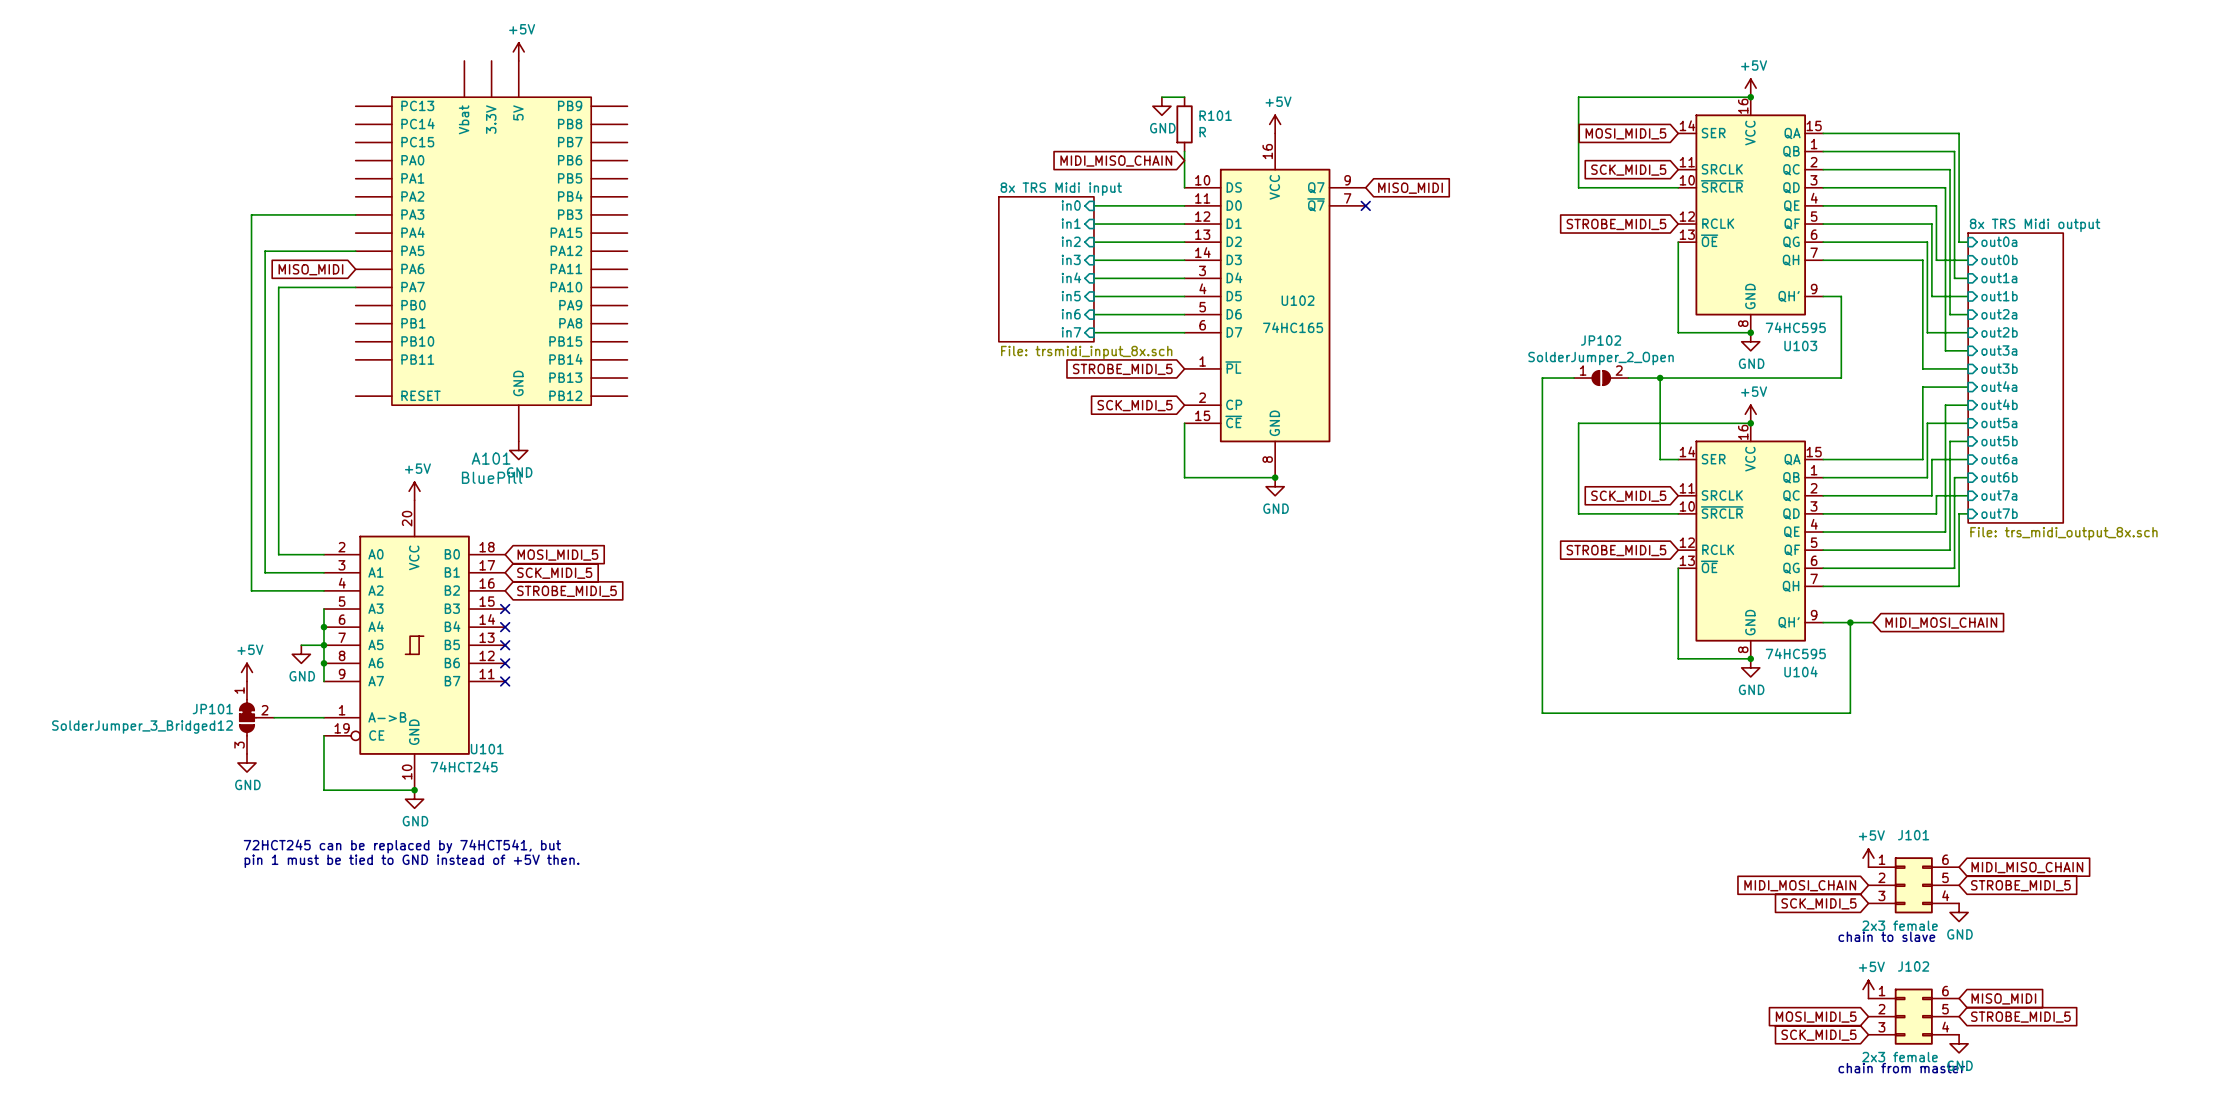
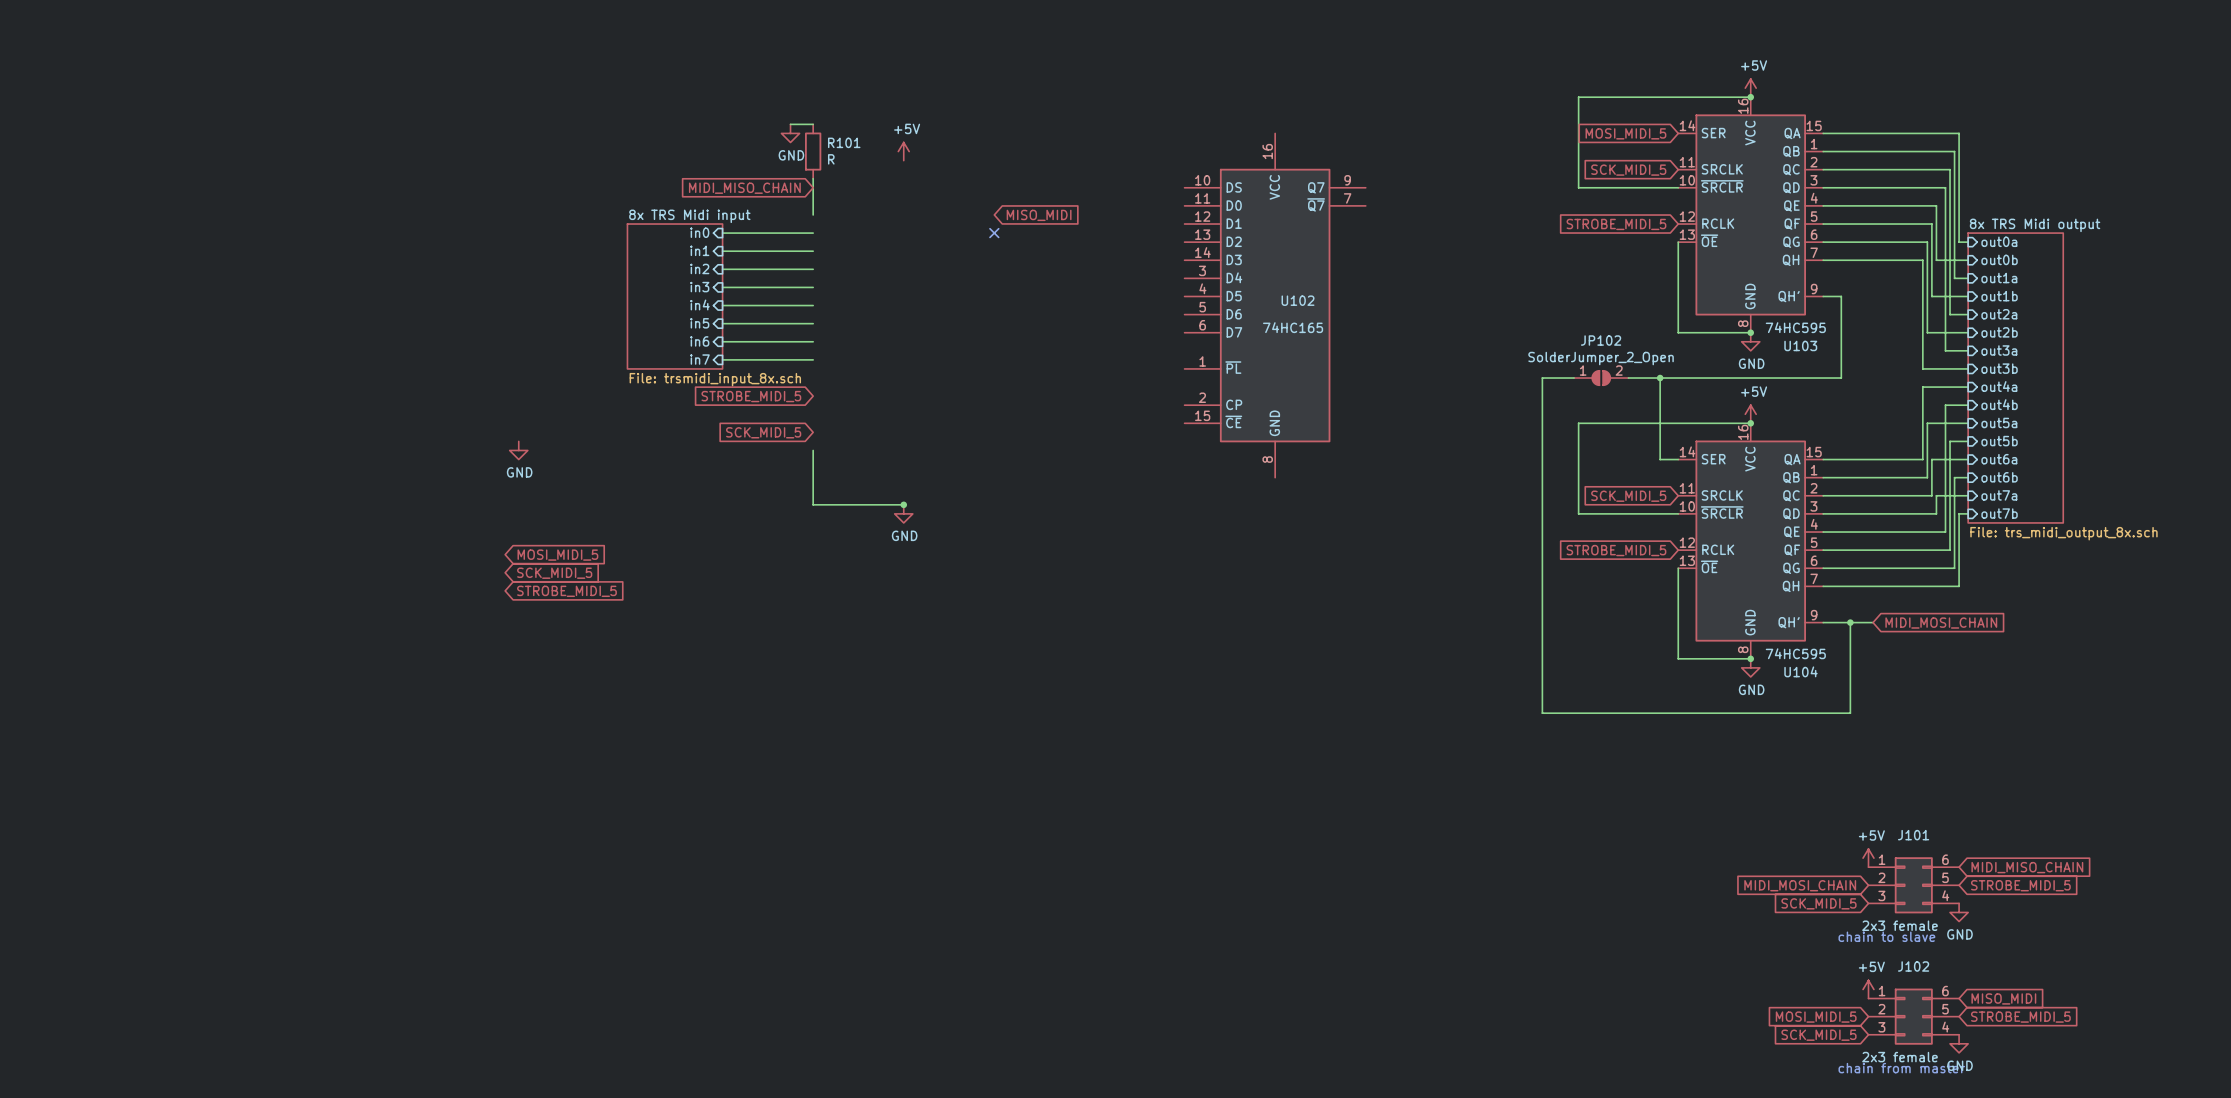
power symbol: +5V (518, 51) -> none
wire: (1161, 97) (1184, 97) -> none
power symbol: GND (1161, 106) -> none
wire: none -> (790, 124) (813, 124)
R101 position: (1184, 124) -> (813, 151)
power symbol: +5V (1275, 124) -> none
power symbol: none -> GND (790, 133)
power symbol: none -> +5V (903, 151)
wire: (1184, 151) (1184, 187) -> none
global label: MIDI_MISO_CHAIN (1116, 161) -> none
wire: none -> (813, 178) (813, 214)
global label: none -> MIDI_MISO_CHAIN (744, 188)
global label: MISO_MIDI (1410, 188) -> none
sheet pin: in0 (1071, 205) -> none
wire: (1093, 205) (1184, 205) -> none
no-connect mark: (1365, 205) -> none
wire: (355, 214) (251, 214) (251, 590) (323, 590) -> none
global label: none -> MISO_MIDI (1039, 215)
sheet pin: in1 (1071, 223) -> none
wire: (1093, 224) (1184, 224) -> none
sheet pin: none -> in0 (699, 232)
wire: none -> (722, 233) (813, 233)
no-connect mark: none -> (994, 233)
sheet pin: in2 (1071, 241) -> none
wire: (1093, 242) (1184, 242) -> none
sheet pin: none -> in1 (699, 250)
wire: (355, 251) (265, 251) (265, 572) (323, 572) -> none
A101: BluePill (491, 251) -> none
wire: none -> (722, 251) (813, 251)
sheet pin: in3 (1071, 259) -> none
wire: (1093, 260) (1184, 260) -> none
sheet pin: none -> in2 (699, 268)
global label: MISO_MIDI (310, 269) -> none
wire: none -> (722, 269) (813, 269)
sheet 8x TRS Midi input position: (1046, 269) -> (675, 296)
sheet pin: in4 (1071, 277) -> none
wire: (1093, 278) (1184, 278) -> none
wire: (355, 287) (278, 287) (278, 554) (323, 554) -> none
sheet pin: none -> in3 (699, 287)
wire: none -> (722, 287) (813, 287)
sheet pin: in5 (1071, 296) -> none
wire: (1093, 296) (1184, 296) -> none
sheet pin: none -> in4 (700, 304)
wire: none -> (722, 305) (813, 305)
sheet pin: in6 (1071, 314) -> none
wire: (1093, 314) (1184, 314) -> none
sheet pin: none -> in5 (699, 323)
wire: none -> (722, 323) (813, 323)
sheet pin: in7 (1071, 332) -> none
wire: (1093, 332) (1184, 332) -> none
sheet pin: none -> in6 (699, 341)
wire: none -> (722, 341) (813, 341)
sheet pin: none -> in7 (700, 359)
wire: none -> (722, 359) (813, 359)
global label: STROBE_MIDI_5 (1122, 369) -> none
global label: none -> STROBE_MIDI_5 (751, 396)
global label: SCK_MIDI_5 (1135, 405) -> none
wire: (1184, 423) (1184, 477) (1275, 477) -> none
global label: none -> SCK_MIDI_5 (763, 432)
wire: none -> (813, 450) (813, 504) (903, 504)
junction: (1275, 477) -> none
power symbol: GND (1275, 486) -> none
power symbol: +5V (414, 491) -> none
junction: none -> (903, 504)
power symbol: none -> GND (903, 513)
wire: (323, 609) (323, 681) -> none
no-connect mark: (505, 609) -> none
junction: (323, 627) -> none
no-connect mark: (505, 627) -> none
wire: (301, 645) (323, 645) -> none
junction: (323, 645) -> none
U101: 74HCT245 (414, 645) -> none
no-connect mark: (505, 645) -> none
power symbol: GND (301, 654) -> none
junction: (323, 663) -> none
no-connect mark: (505, 663) -> none
power symbol: +5V (246, 672) -> none
no-connect mark: (505, 681) -> none
JP101: SolderJumper_3_Bridged12 (256, 717) -> none
wire: (274, 717) (323, 717) -> none
wire: (323, 735) (323, 790) (414, 790) -> none
power symbol: GND (246, 763) -> none
junction: (414, 790) -> none
power symbol: GND (414, 799) -> none
text: 72HCT245 can be replaced by 74HCT541, but (402, 846) -> none
text: pin 1 must be tied to GND instead of +5V then. (412, 861) -> none

